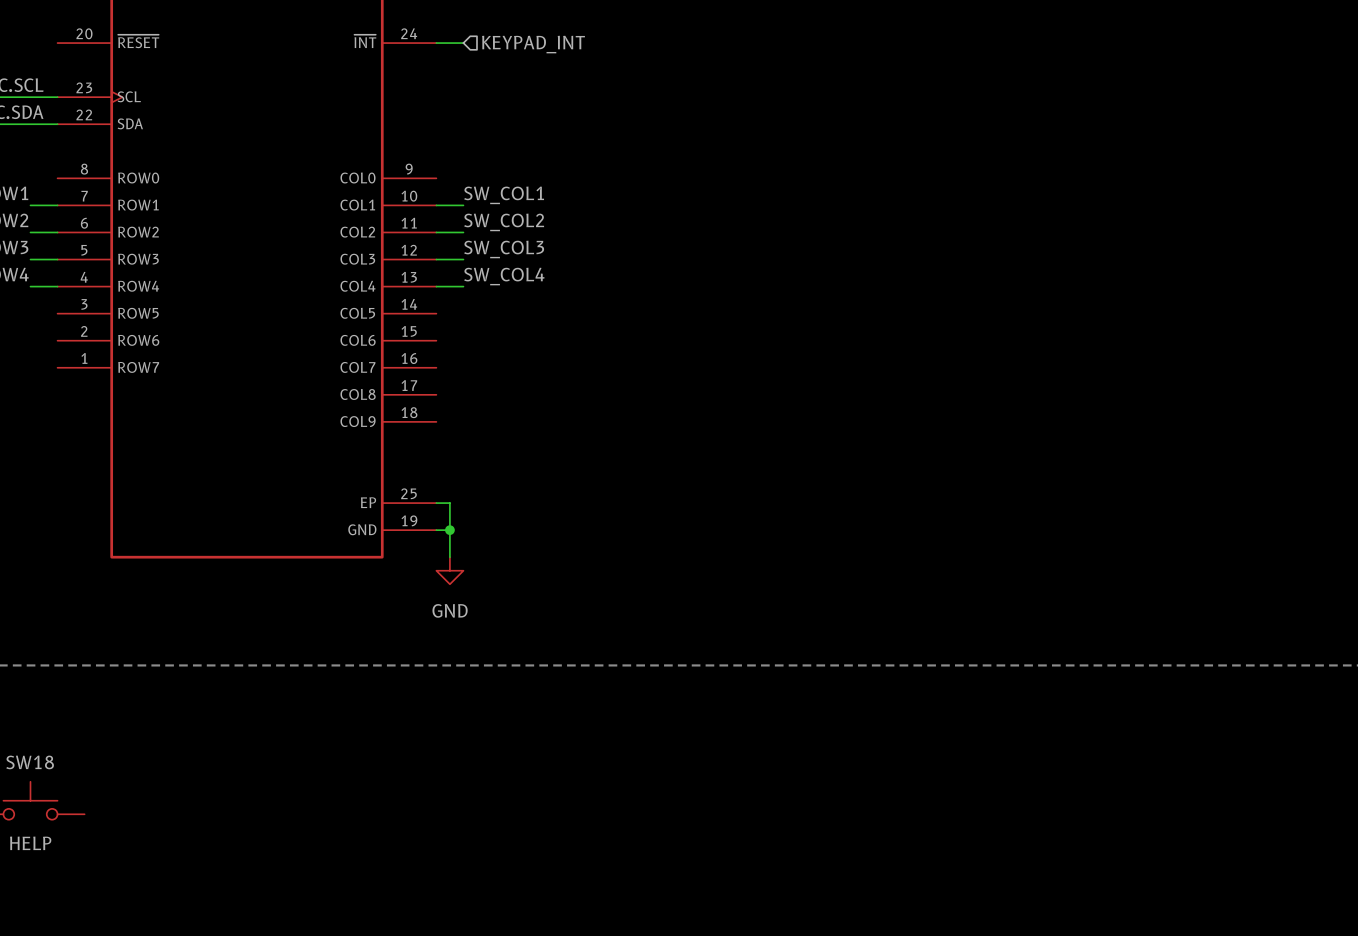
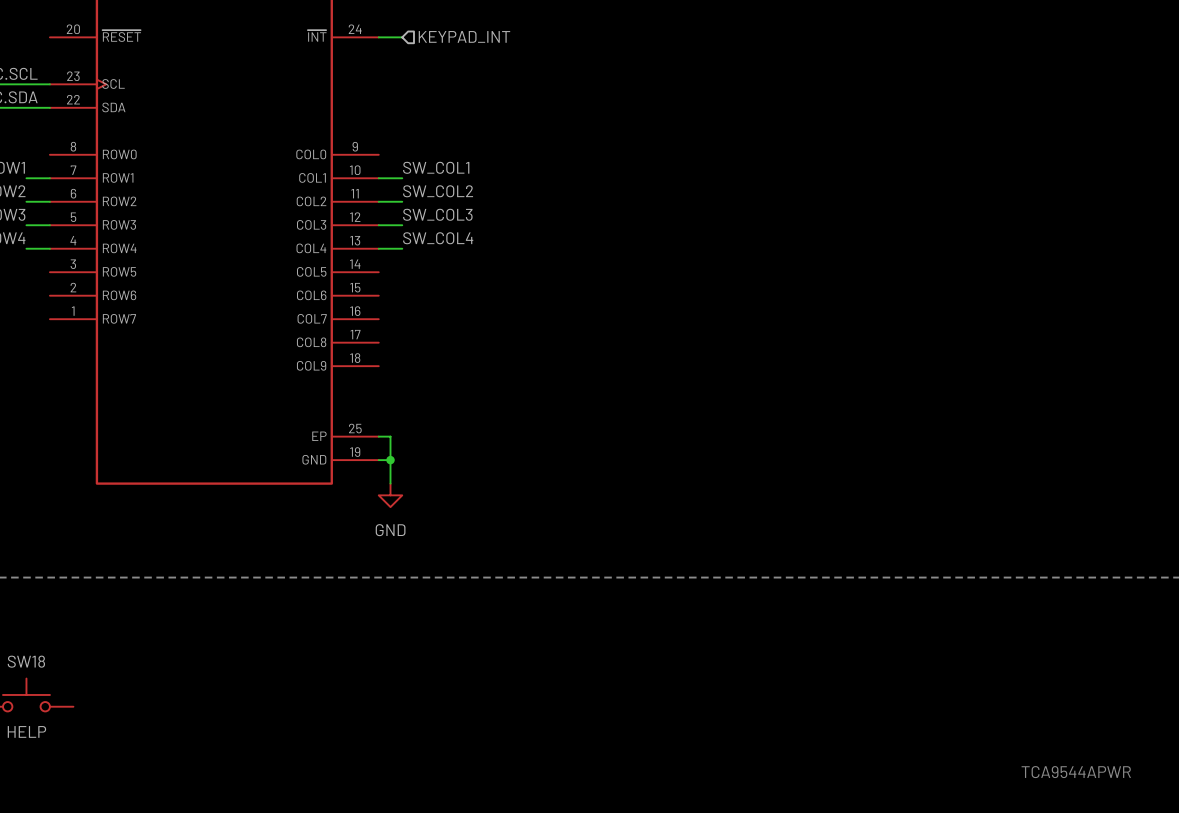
text: none -> TCA9544APWR (1076, 772)

